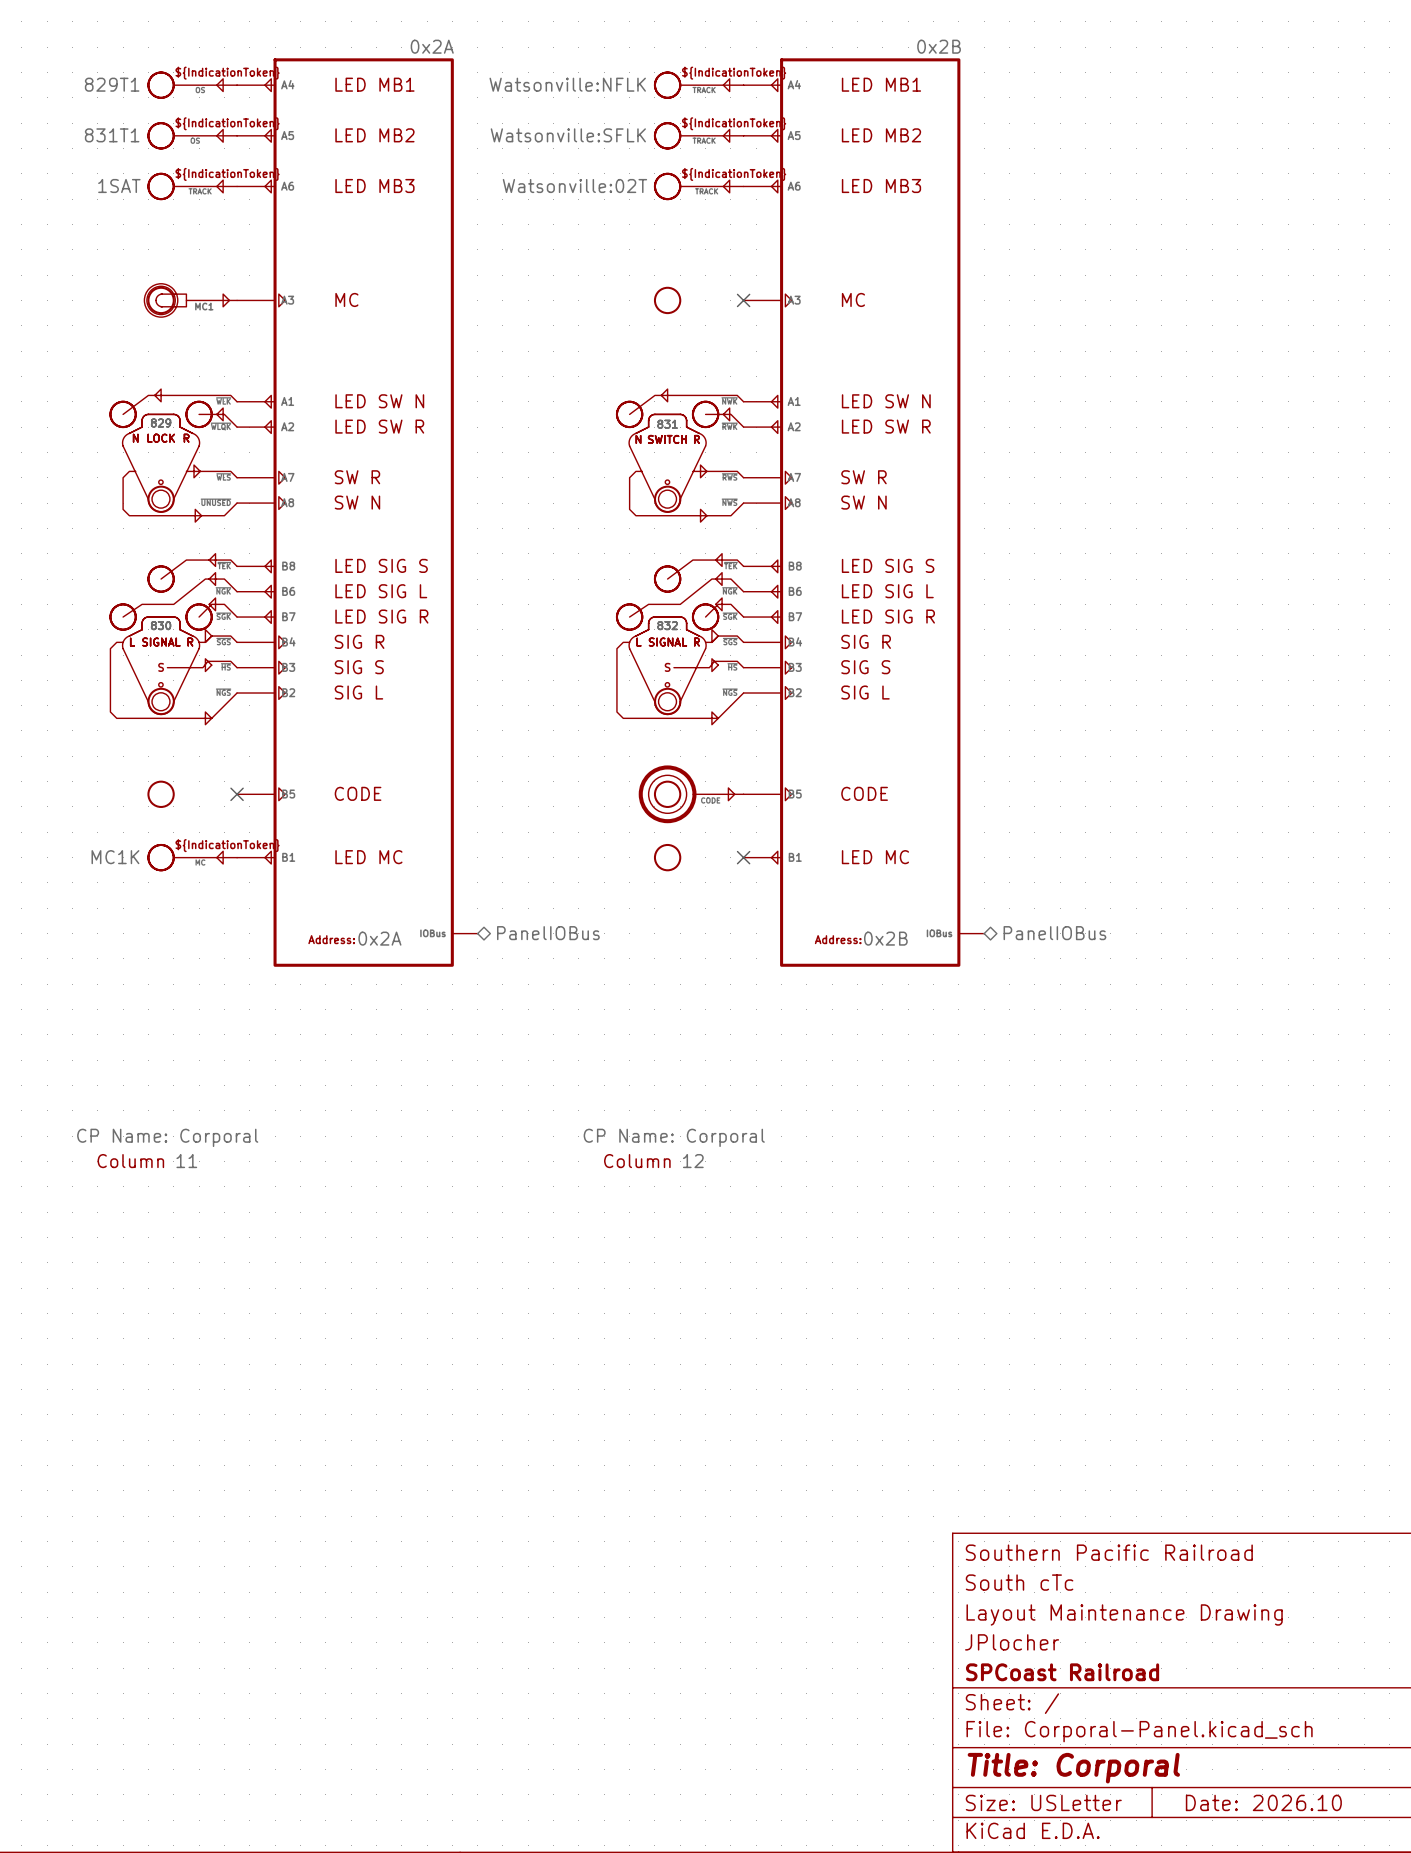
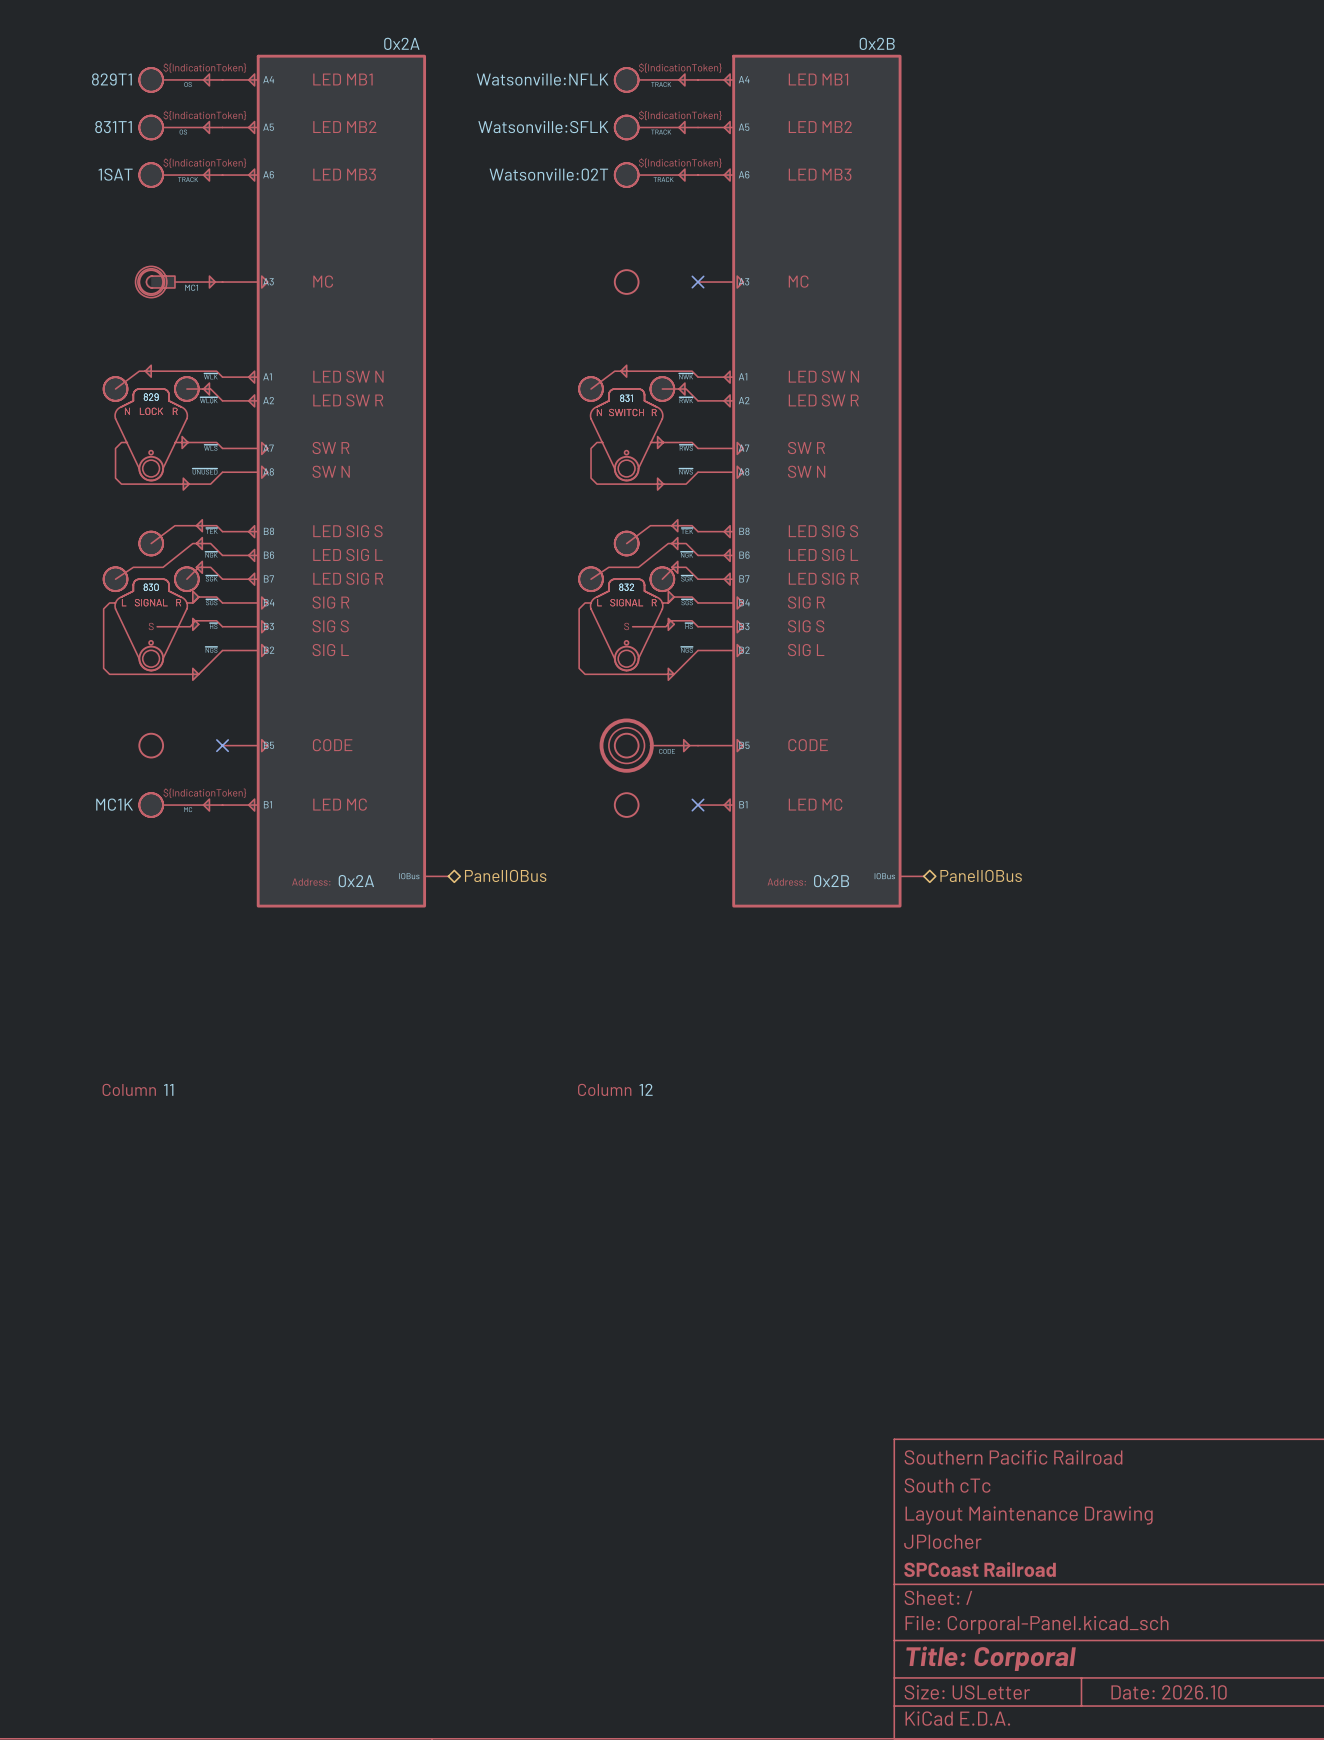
part text: CP Name: Corporal (167, 1137) -> none
part text: CP Name: Corporal (674, 1137) -> none

